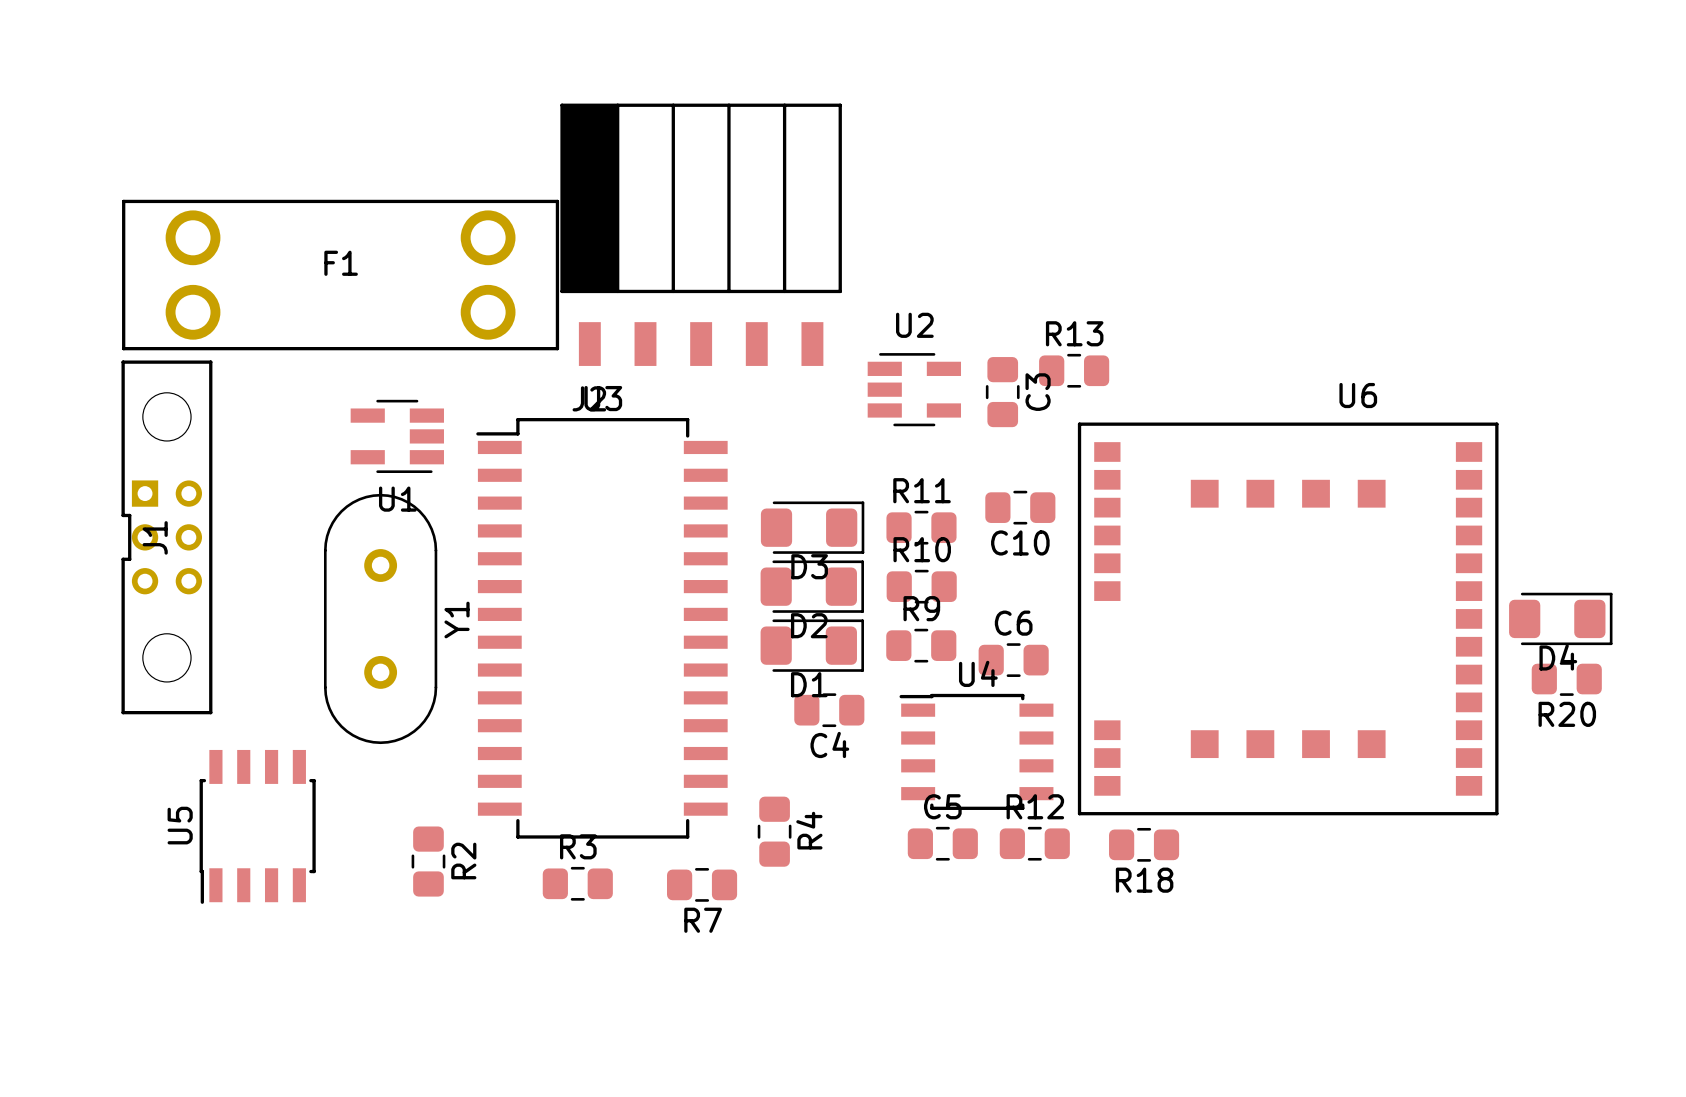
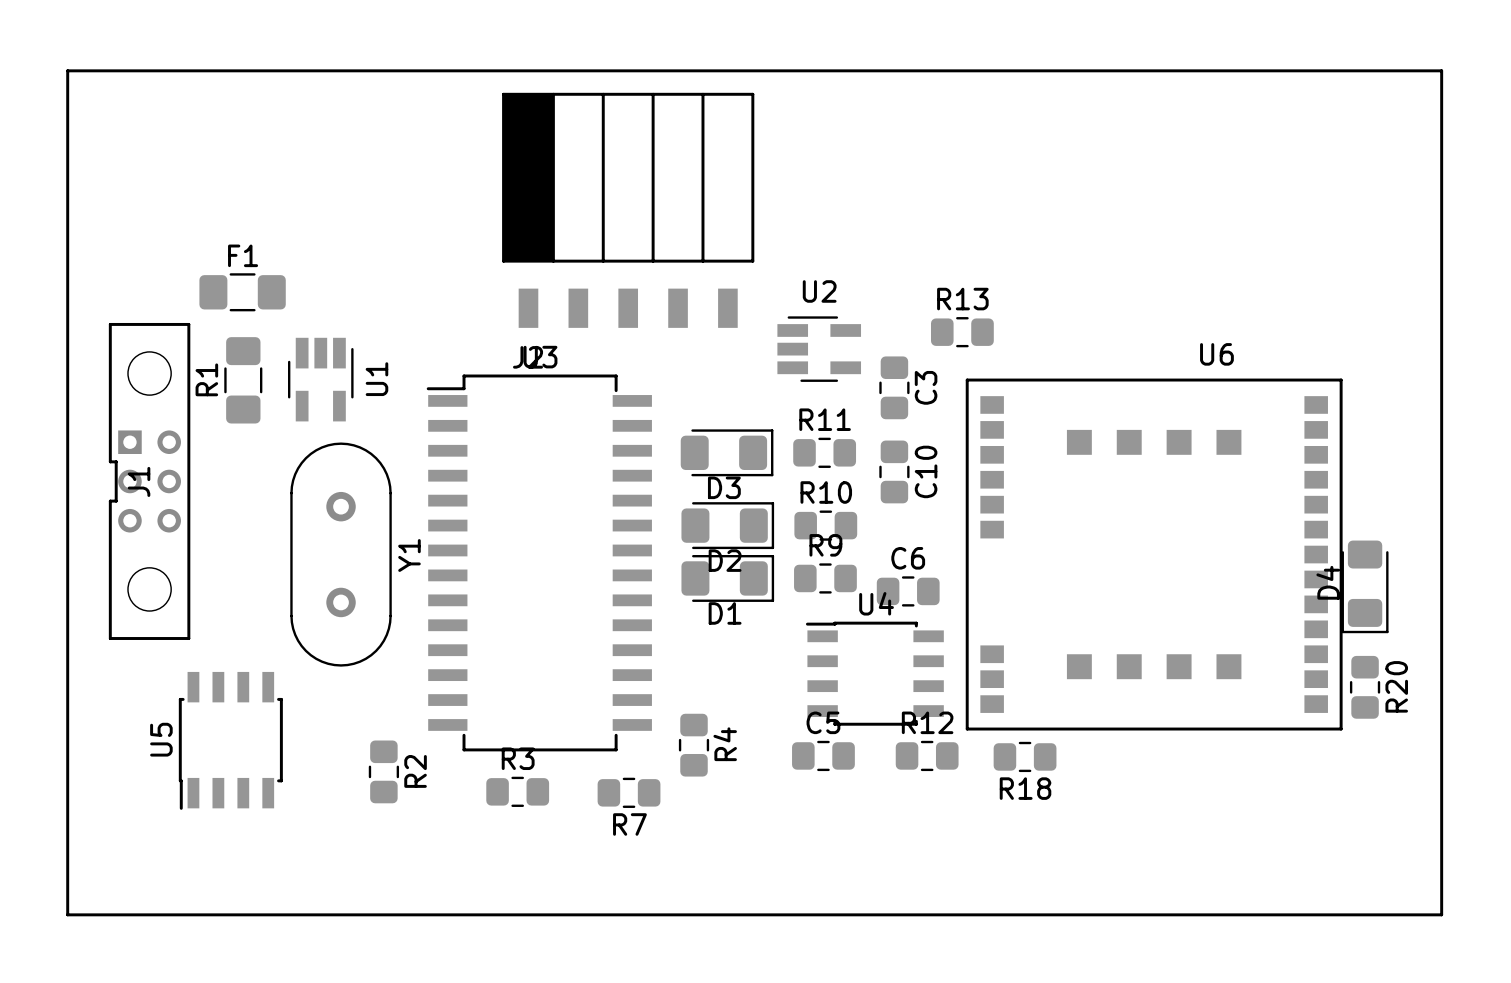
board edge: none -> (67, 70) (67, 914) (1441, 914) (1441, 70) (67, 70)
F1 footprint: [122, 199, 560, 351] -> [199, 273, 286, 312]
C3 position: (1002, 392) -> (894, 387)
R1: none -> (243, 380)
U1 rotation: 0° (397, 436) -> 90° counterclockwise (320, 379)
C10 rotation: 0° (1020, 507) -> 90° clockwise (894, 471)
D3 position: (812, 527) -> (727, 452)
R11 position: (921, 527) -> (824, 452)
C10 name position: C10 (1020, 542) -> C10 (926, 471)
D4 rotation: 0° (1560, 618) -> 90° clockwise (1365, 586)
R20 rotation: 0° (1566, 679) -> 90° clockwise (1365, 687)
R20 position: (1566, 679) -> (1365, 687)
C4: (829, 710) -> none
R20 name position: R20 (1567, 714) -> R20 (1396, 686)
C5 position: (942, 843) -> (823, 755)

